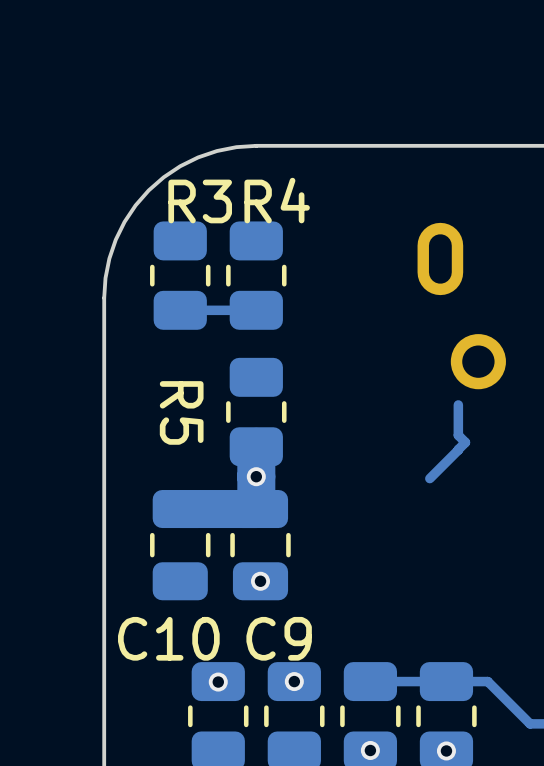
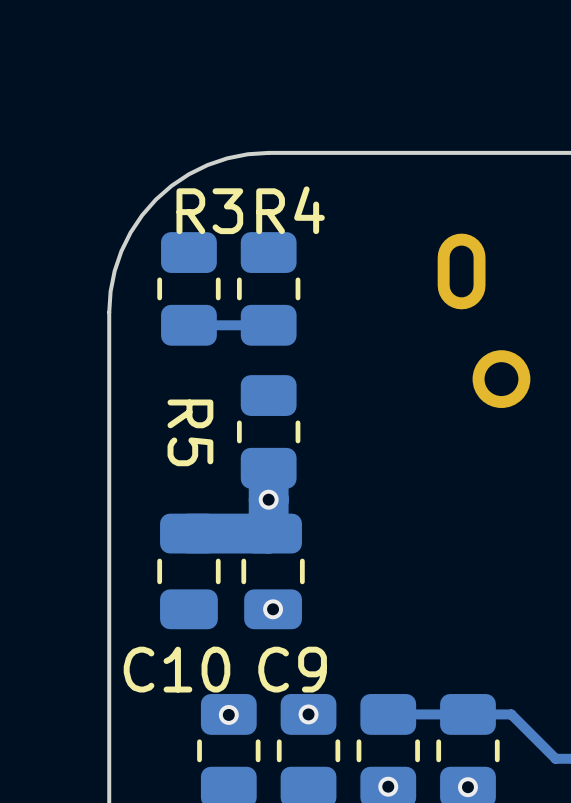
track: (458, 404) (458, 435) (465, 442) (458, 449) -> none
track: (458, 450) (429, 478) -> none

